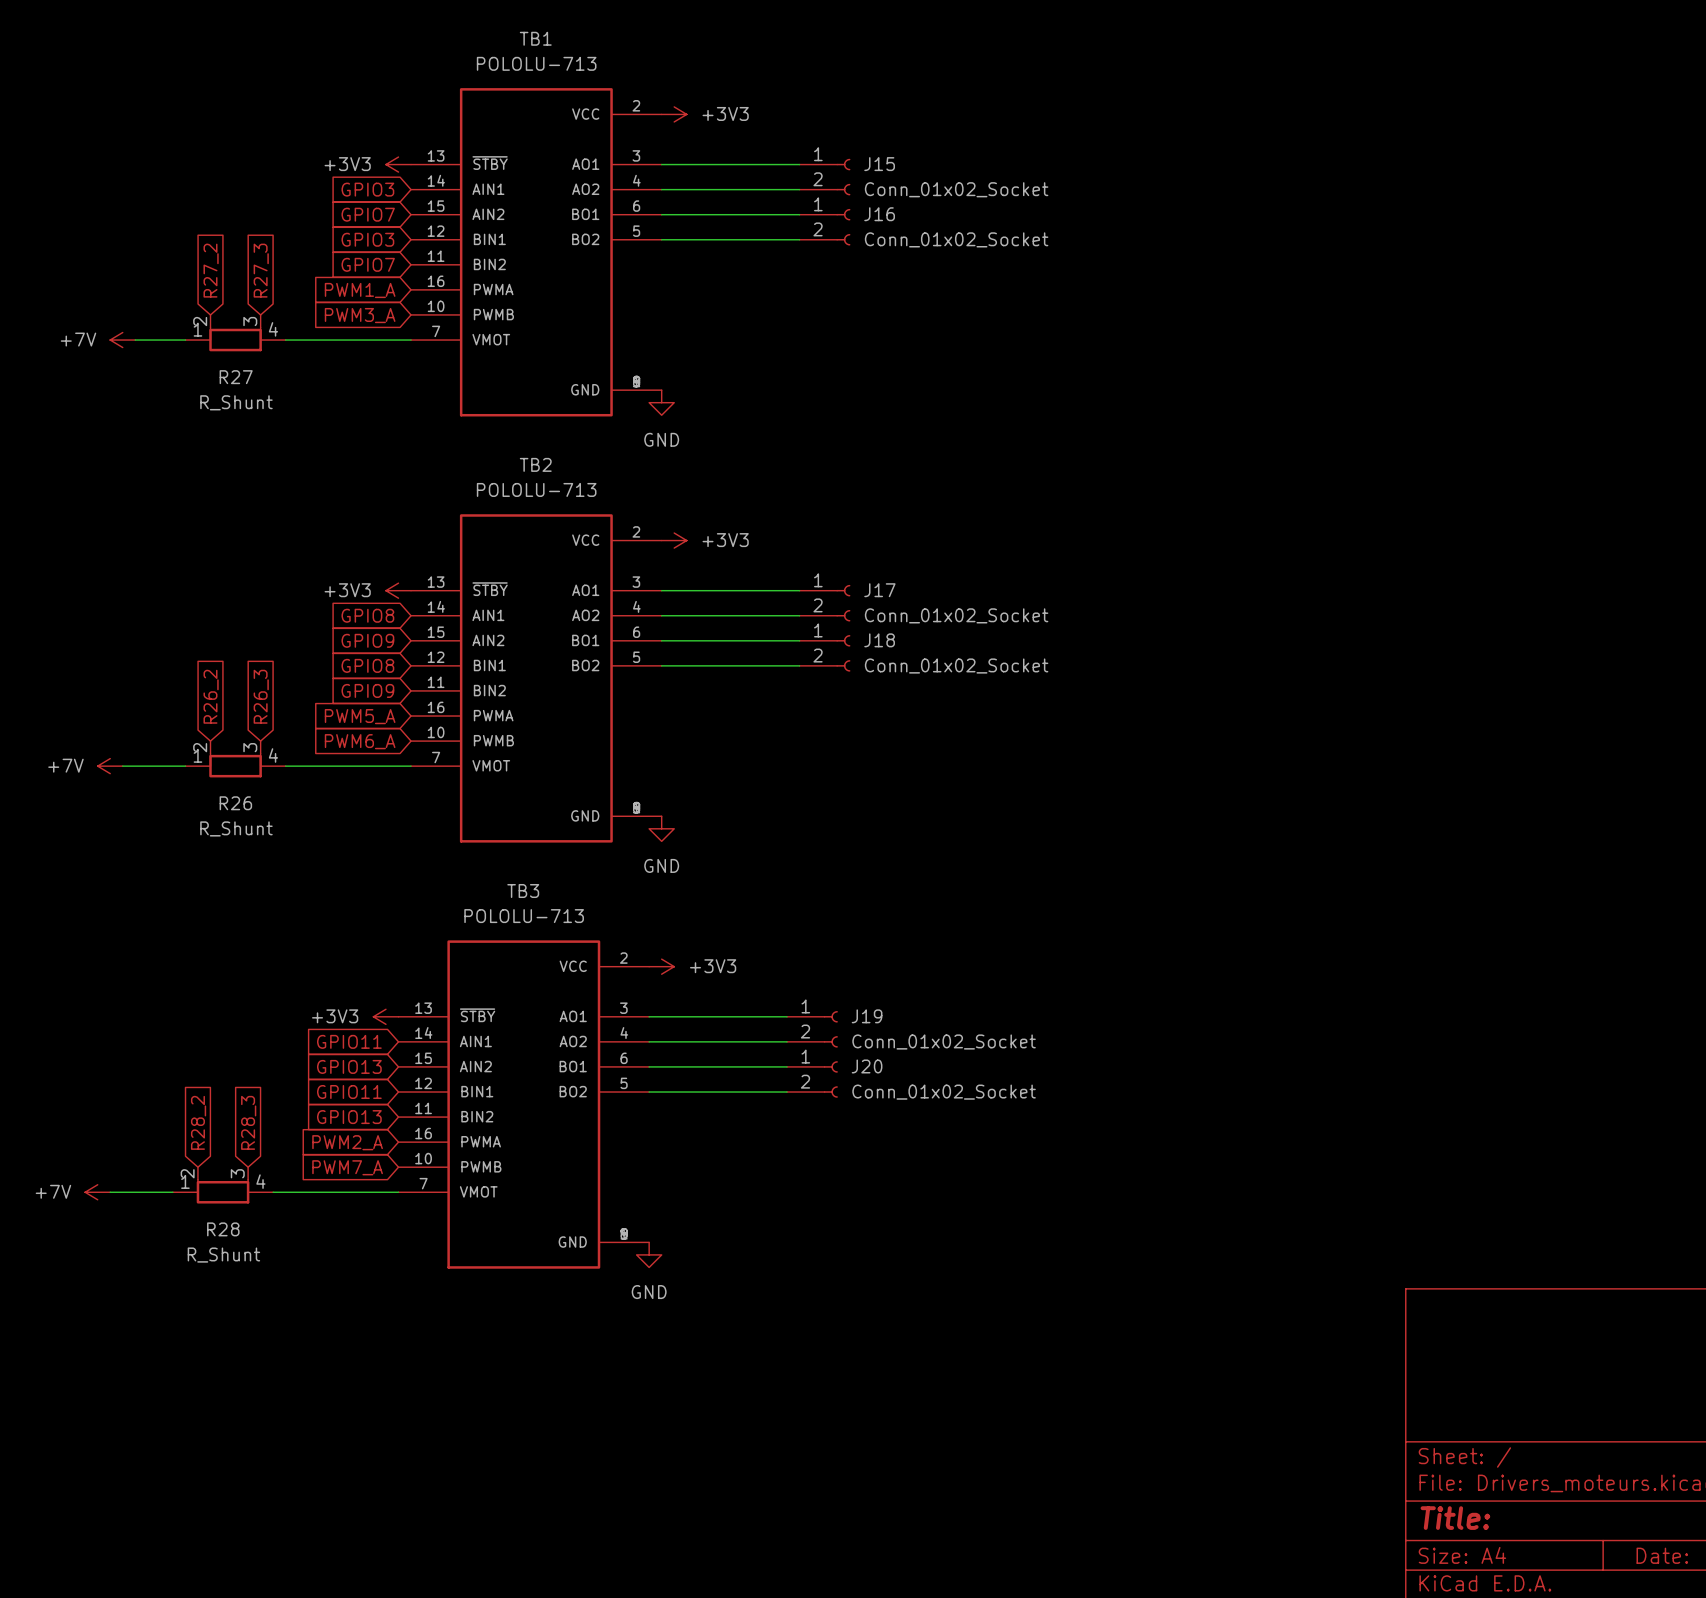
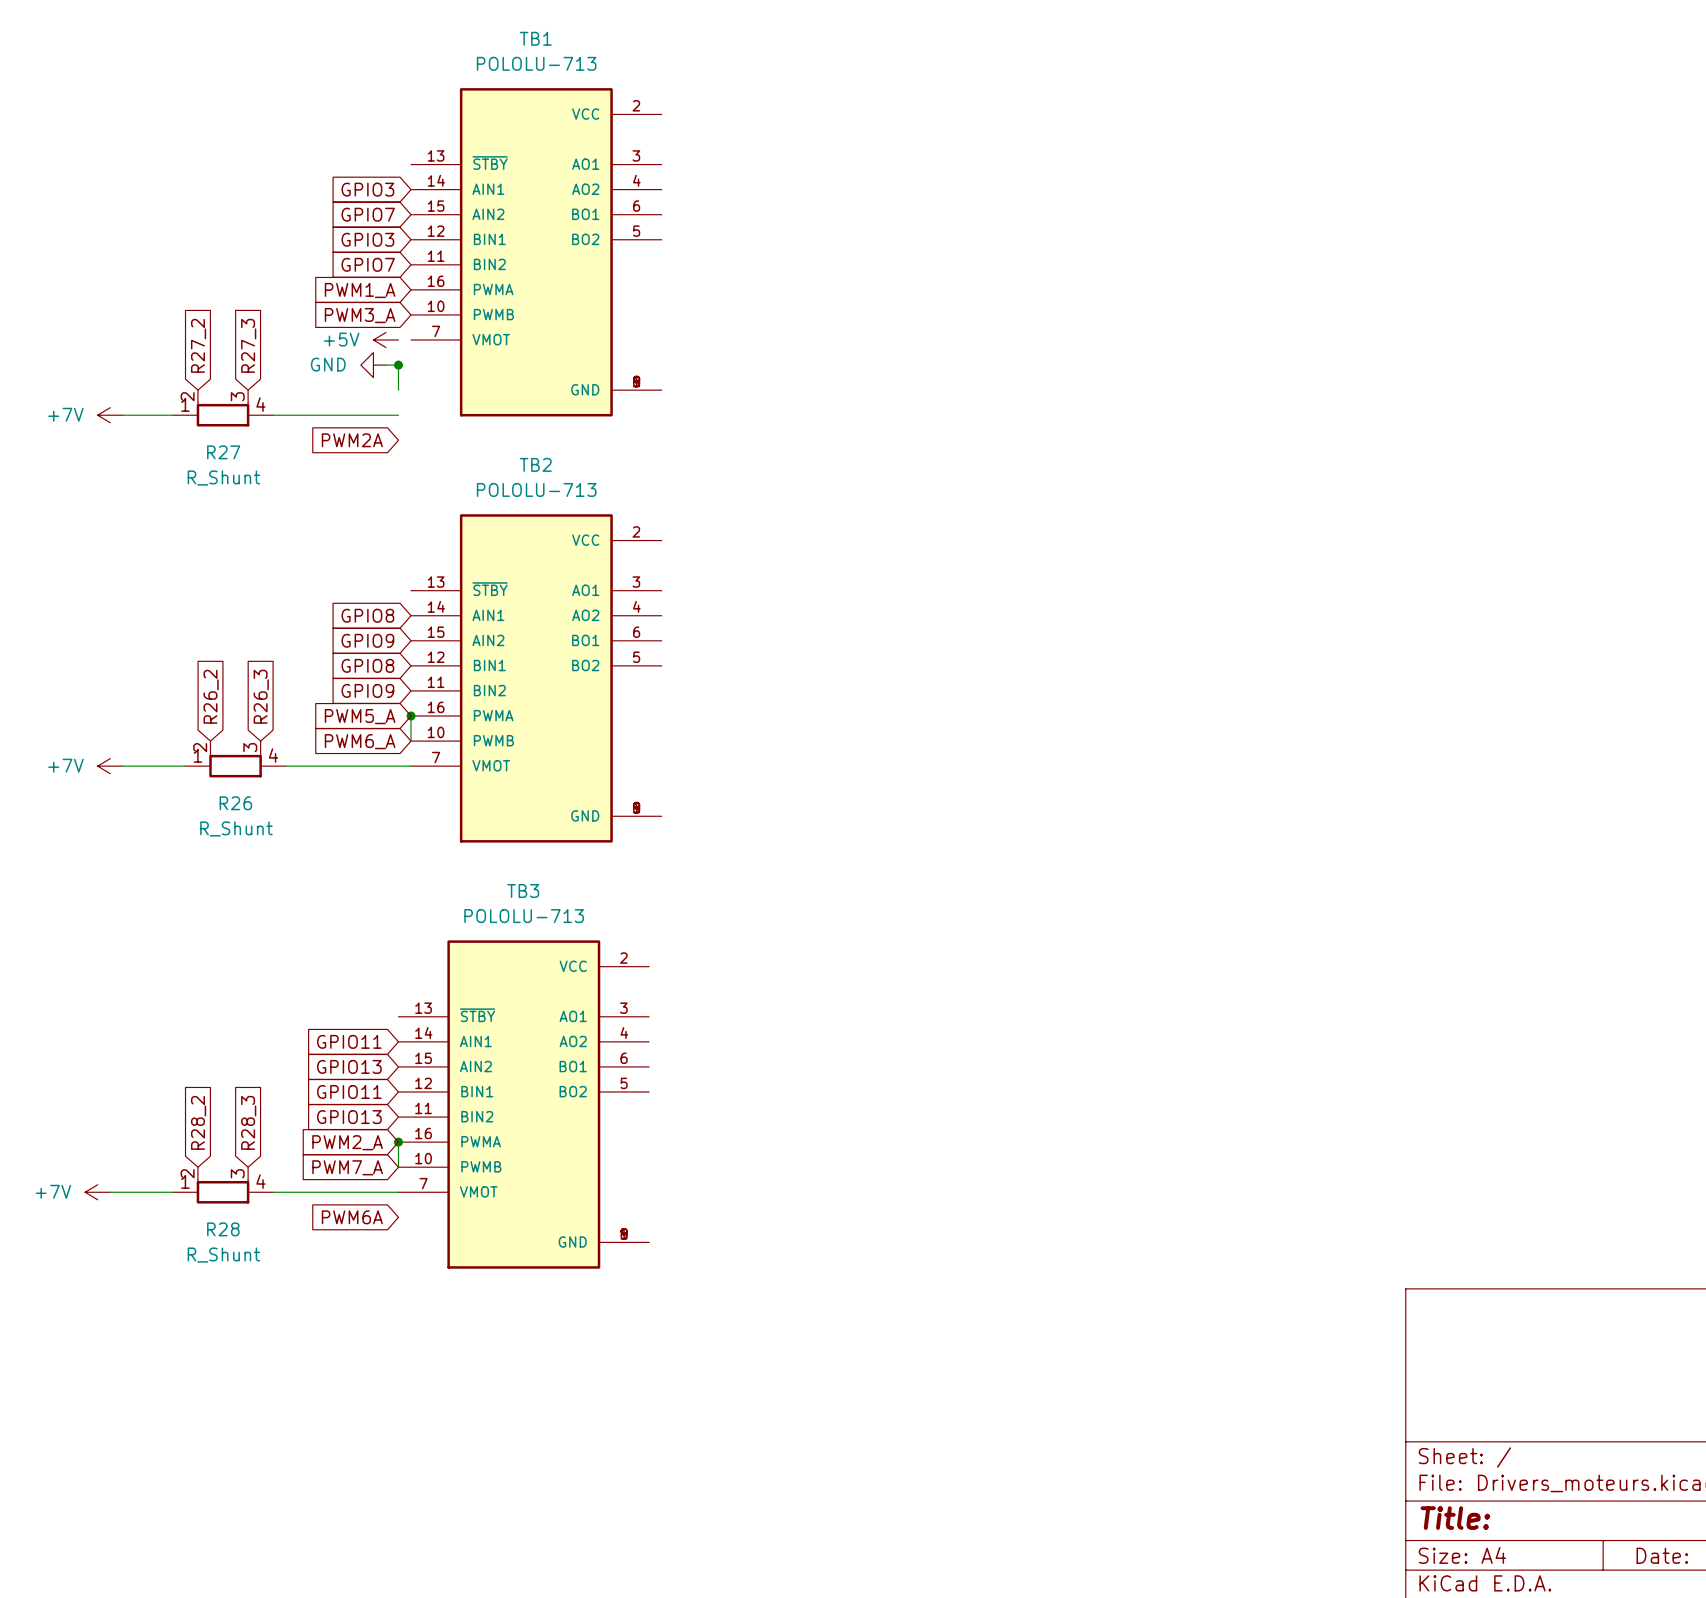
power symbol: +3V3 (674, 114) -> none
power symbol: +3V3 (398, 164) -> none
wire: (661, 164) (799, 164) -> none
J15: Conn_01x02_Socket (824, 177) -> none
wire: (661, 189) (799, 189) -> none
wire: (661, 214) (799, 214) -> none
J16: Conn_01x02_Socket (824, 227) -> none
wire: (661, 239) (799, 239) -> none
global label position: R27_2 (211, 270) -> R27_2 (198, 345)
global label position: R27_3 (261, 270) -> R27_3 (248, 345)
R27 position: (235, 333) -> (223, 408)
power symbol position: +7V (122, 340) -> +7V (110, 415)
wire: (135, 340) (185, 340) -> (122, 415) (172, 415)
wire: (285, 340) (411, 340) -> (273, 415) (398, 415)
power symbol: none -> +5V (385, 340)
power symbol: none -> GND (373, 365)
wire: none -> (385, 365) (398, 365) (398, 390)
junction: none -> (398, 365)
power symbol: GND (661, 402) -> none
global label: none -> PWM2A (352, 440)
power symbol: +3V3 (674, 540) -> none
power symbol: +3V3 (398, 590) -> none
wire: (661, 590) (799, 590) -> none
J17: Conn_01x02_Socket (824, 603) -> none
wire: (661, 615) (799, 615) -> none
wire: (661, 640) (799, 640) -> none
J18: Conn_01x02_Socket (824, 653) -> none
wire: (661, 665) (799, 665) -> none
wire: none -> (411, 716) (411, 741)
junction: none -> (411, 716)
power symbol: GND (661, 828) -> none
power symbol: +3V3 (661, 966) -> none
power symbol: +3V3 (385, 1016) -> none
wire: (649, 1016) (787, 1016) -> none
J19: Conn_01x02_Socket (812, 1029) -> none
wire: (649, 1041) (787, 1041) -> none
wire: (649, 1066) (787, 1066) -> none
J20: Conn_01x02_Socket (812, 1079) -> none
wire: (649, 1092) (787, 1092) -> none
wire: none -> (398, 1142) (398, 1167)
junction: none -> (398, 1142)
global label: none -> PWM6A (352, 1217)
power symbol: GND (649, 1254) -> none

